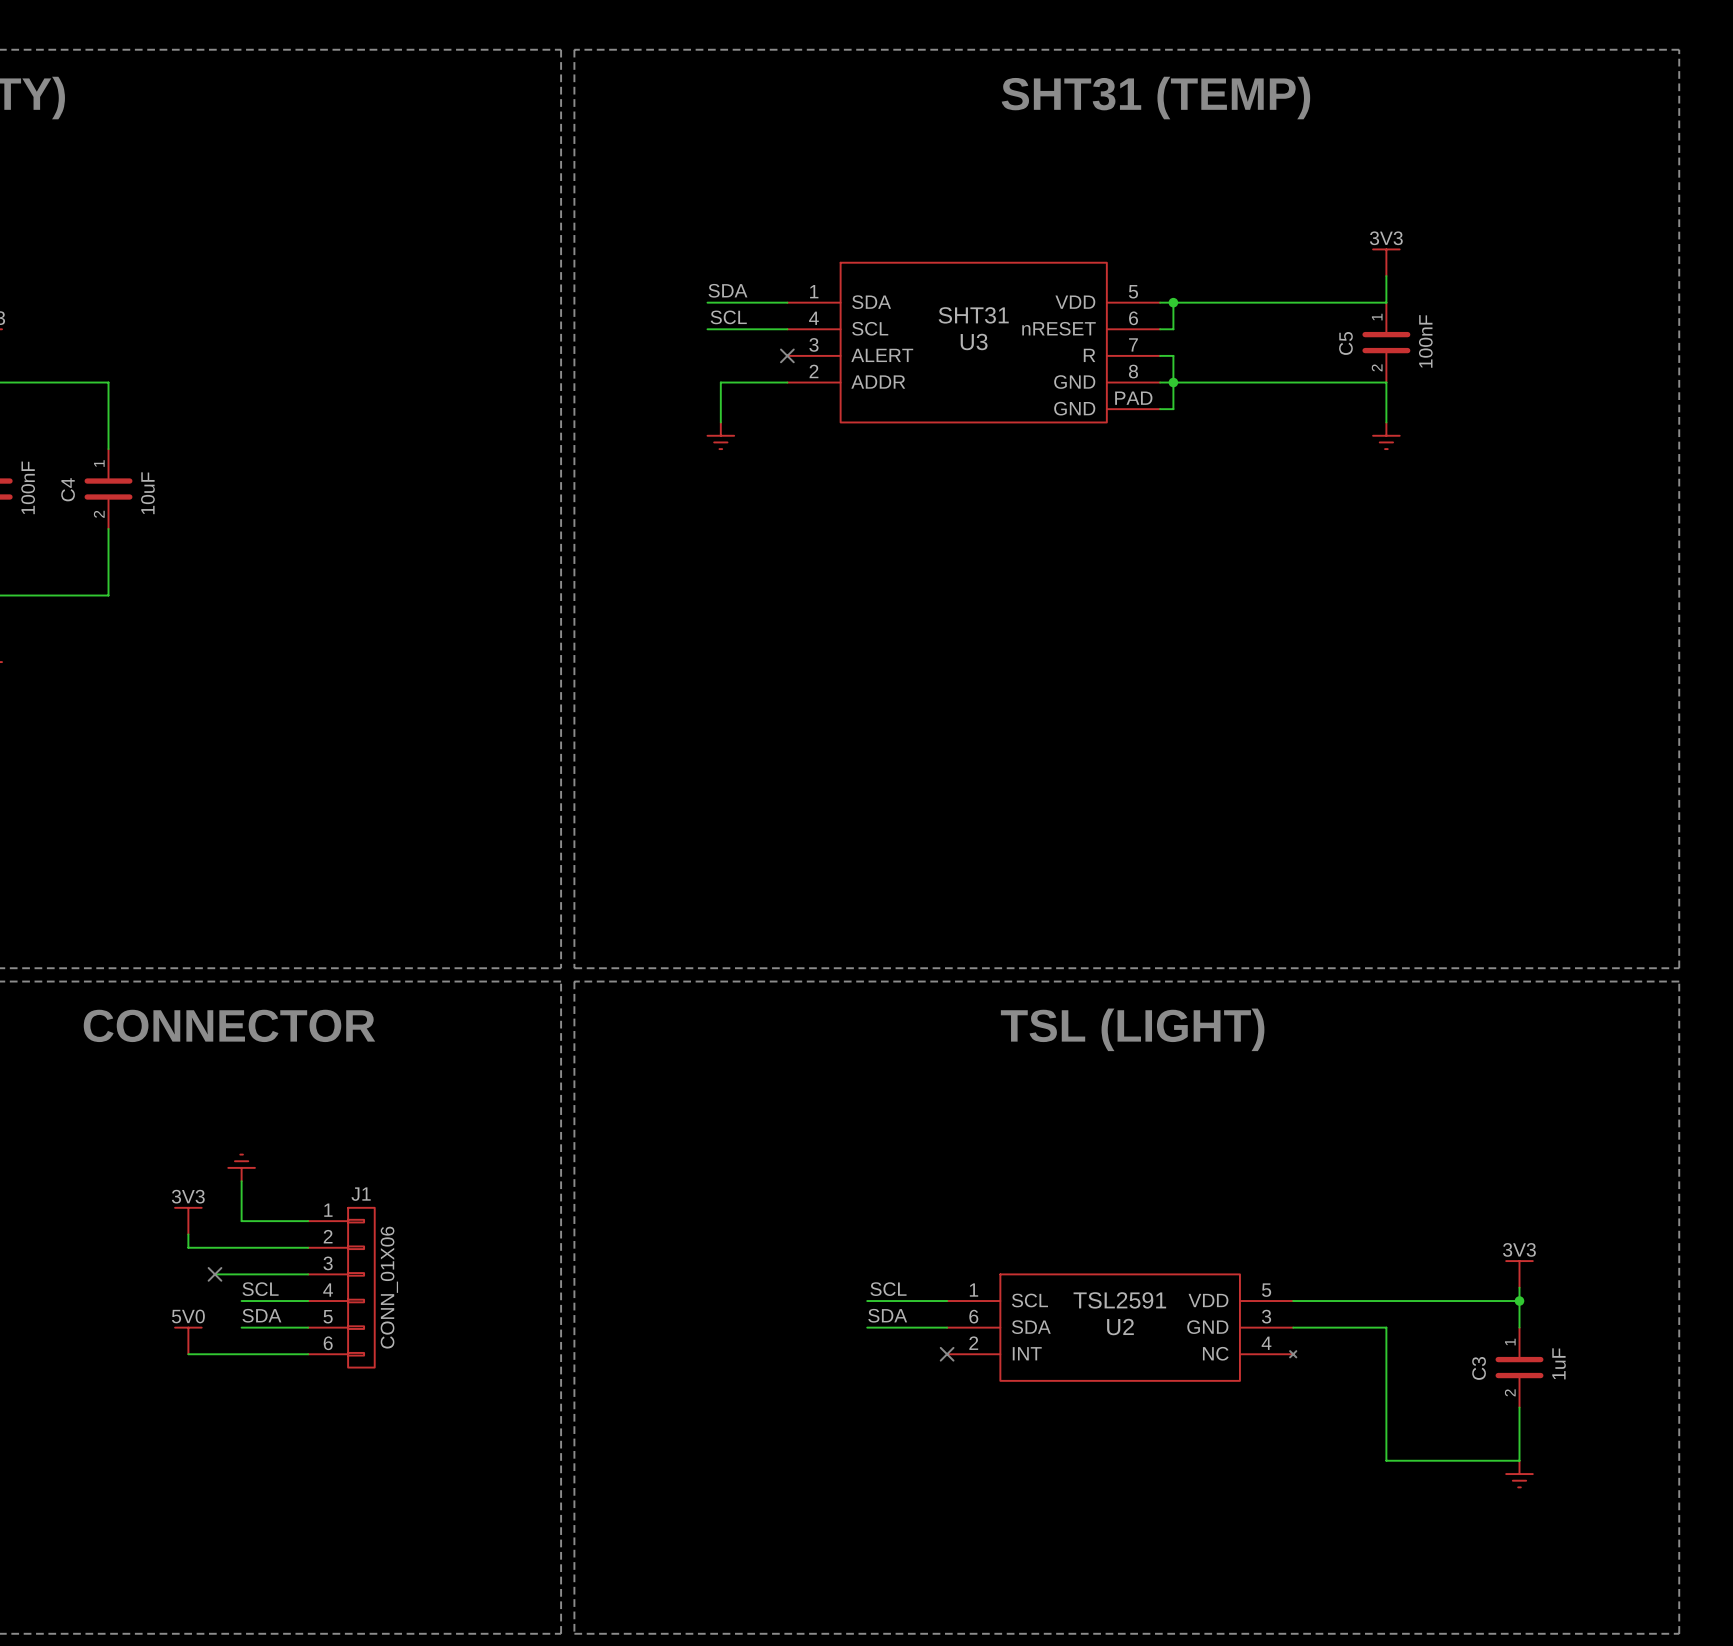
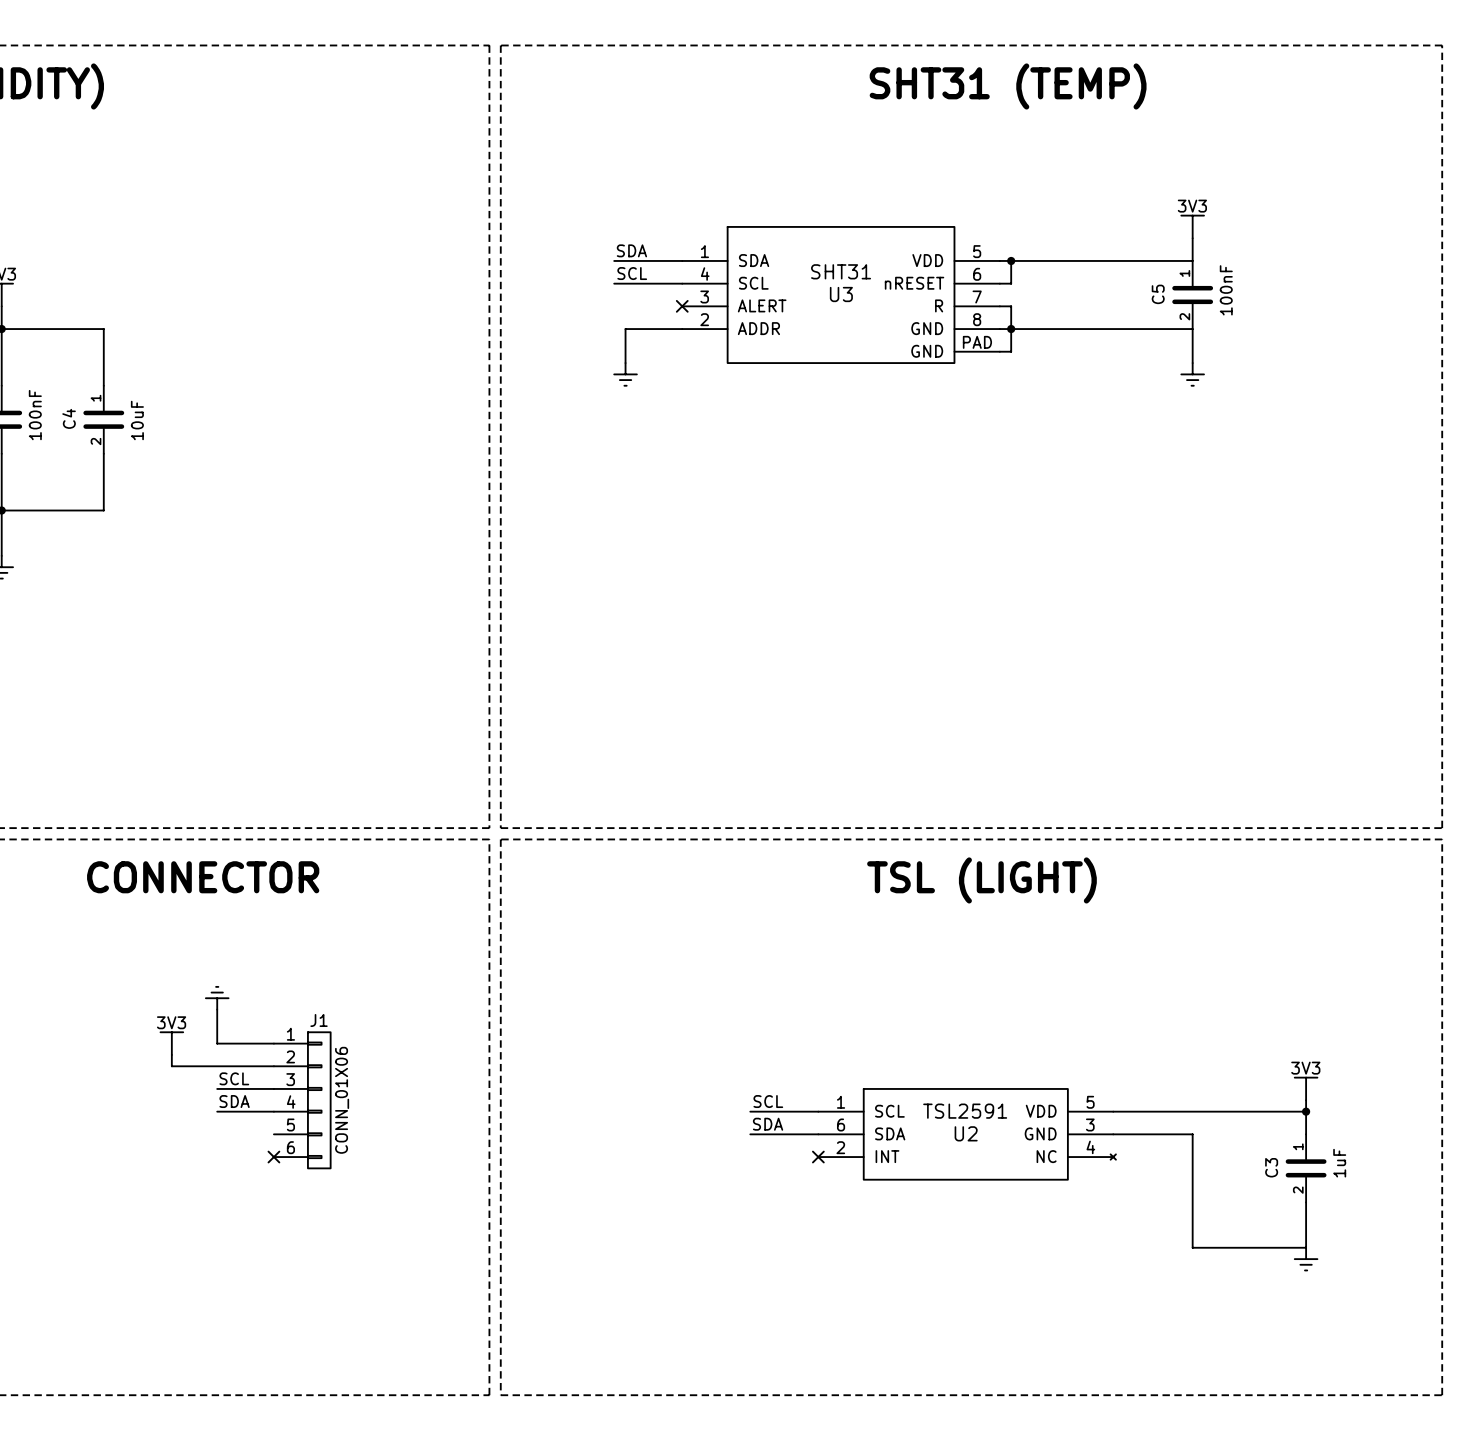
label: none -> SCL (234, 1078)
wire: (214, 1274) (241, 1274) -> none
no-connect mark: (214, 1274) -> none
label: SCL (260, 1289) -> SDA (234, 1101)
label: SDA (261, 1315) -> none
wire: (241, 1327) (308, 1327) -> none
power symbol: 5V0 (188, 1340) -> none
wire: (188, 1354) (308, 1354) -> none
no-connect mark: none -> (273, 1157)

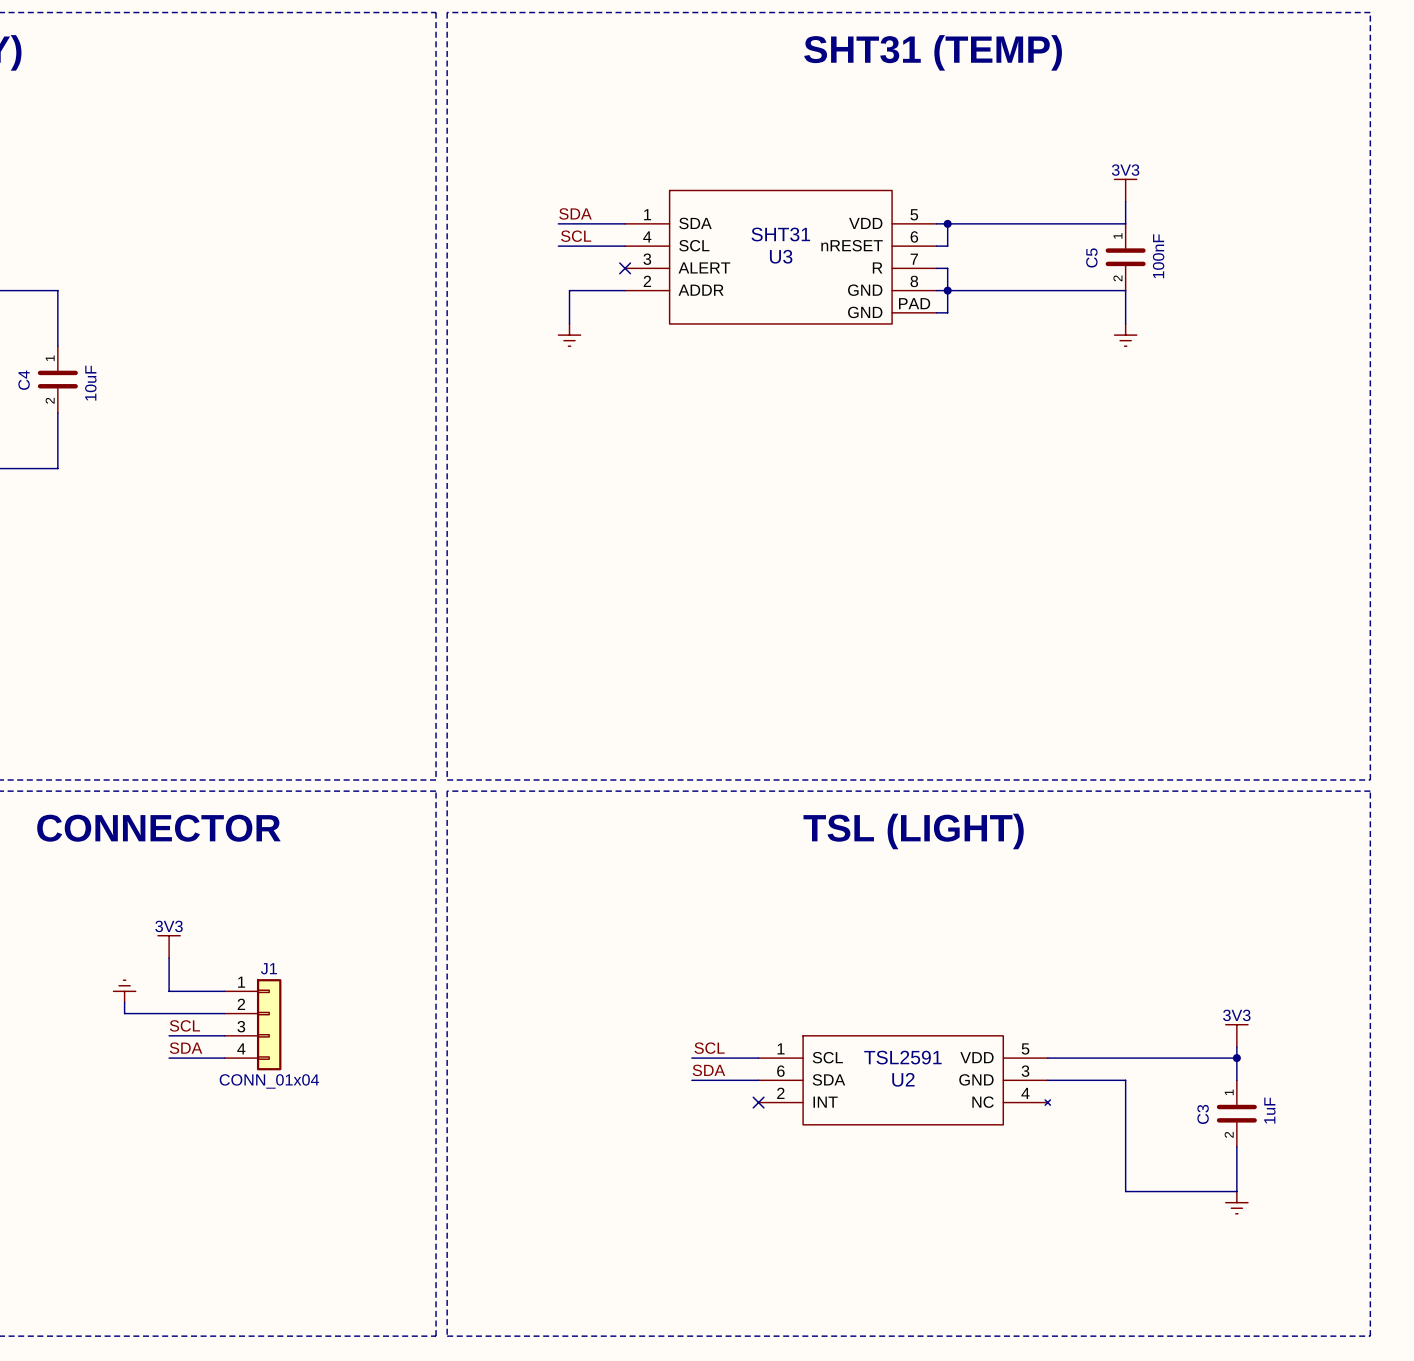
power symbol text: none -> 3V3 (169, 926)
power symbol shape: [205, 986, 229, 1010] -> [157, 935, 181, 958]
power symbol text: 3V3 (171, 1022) -> none
power symbol shape: [160, 1032, 184, 1055] -> [113, 980, 136, 1003]
J1 symbol: [273, 1032, 331, 1169] -> [224, 979, 282, 1071]
J1 value: CONN_01X06 (342, 1100) -> CONN_01x04 (269, 1081)
no-connect mark: (273, 1157) -> none

